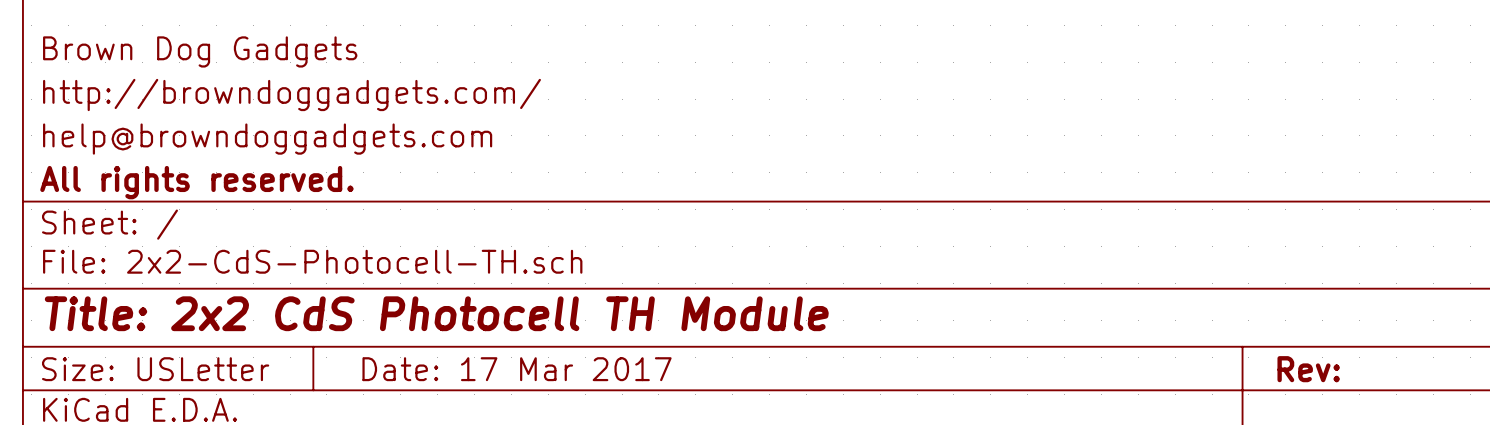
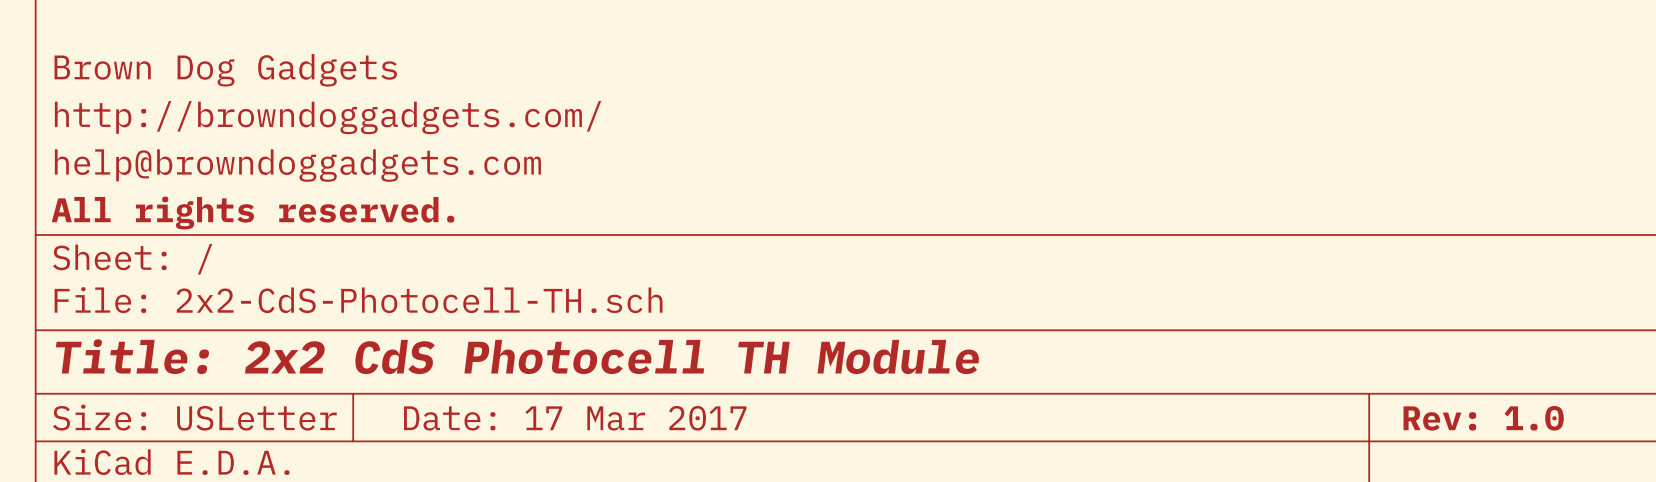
title block: Rev: (1308, 369) -> Rev: 1.0 (1483, 418)

